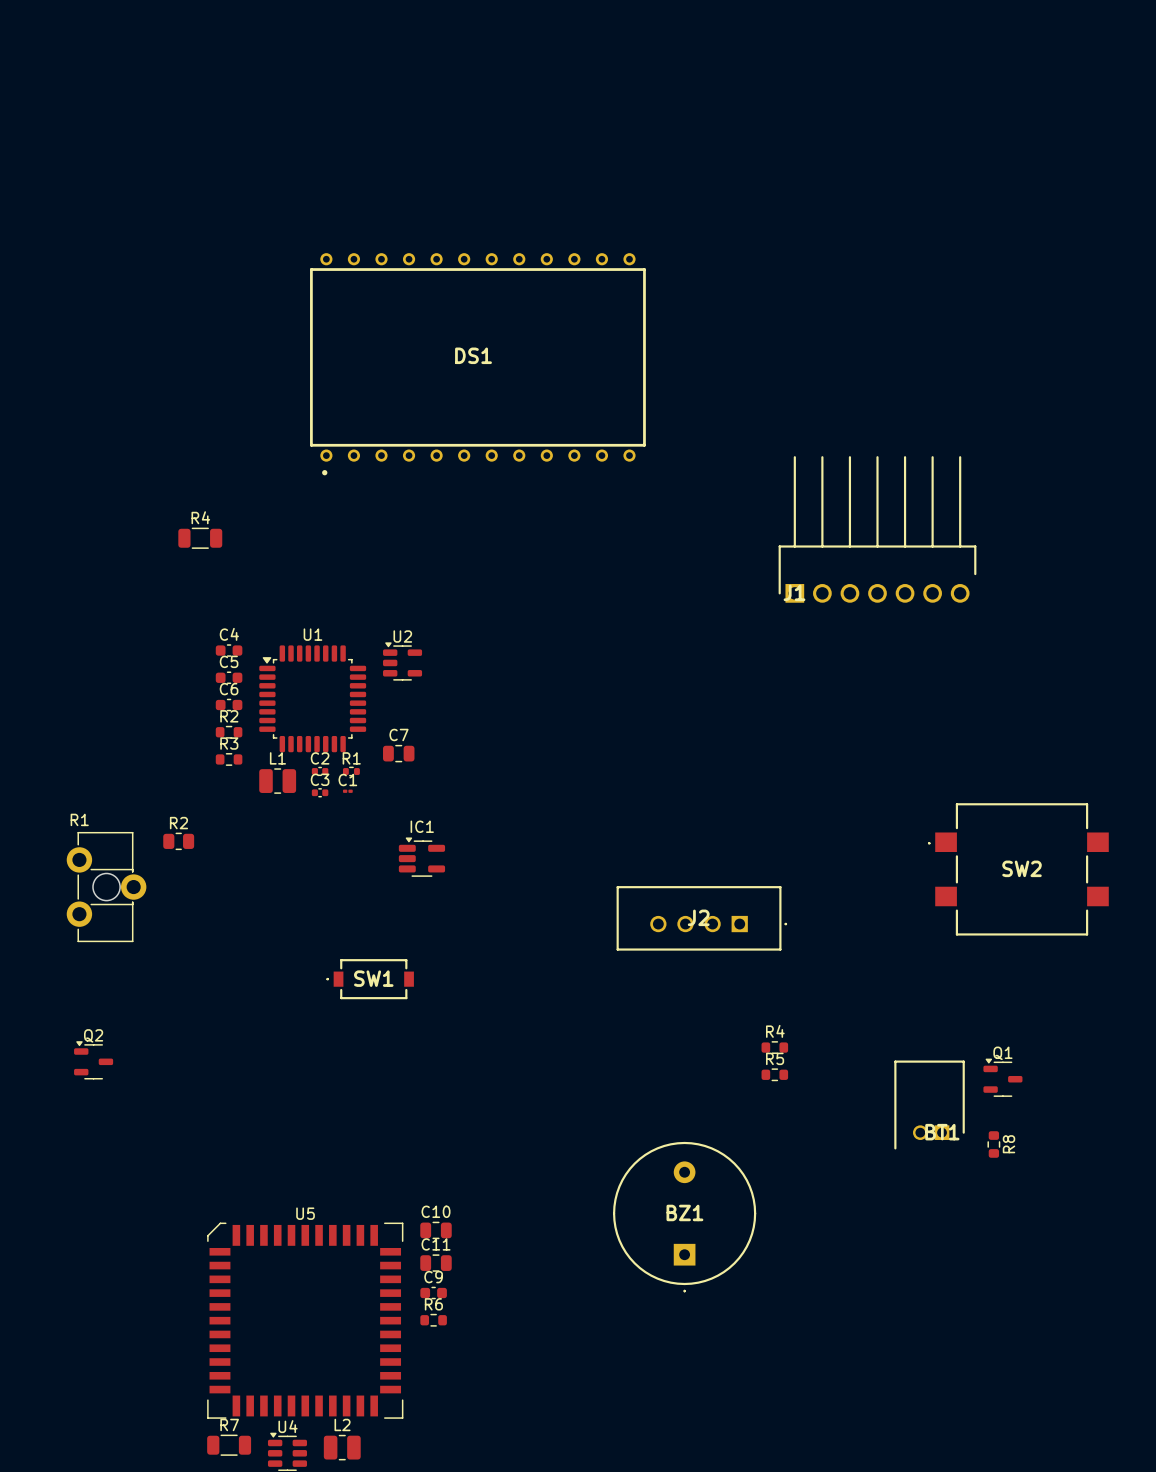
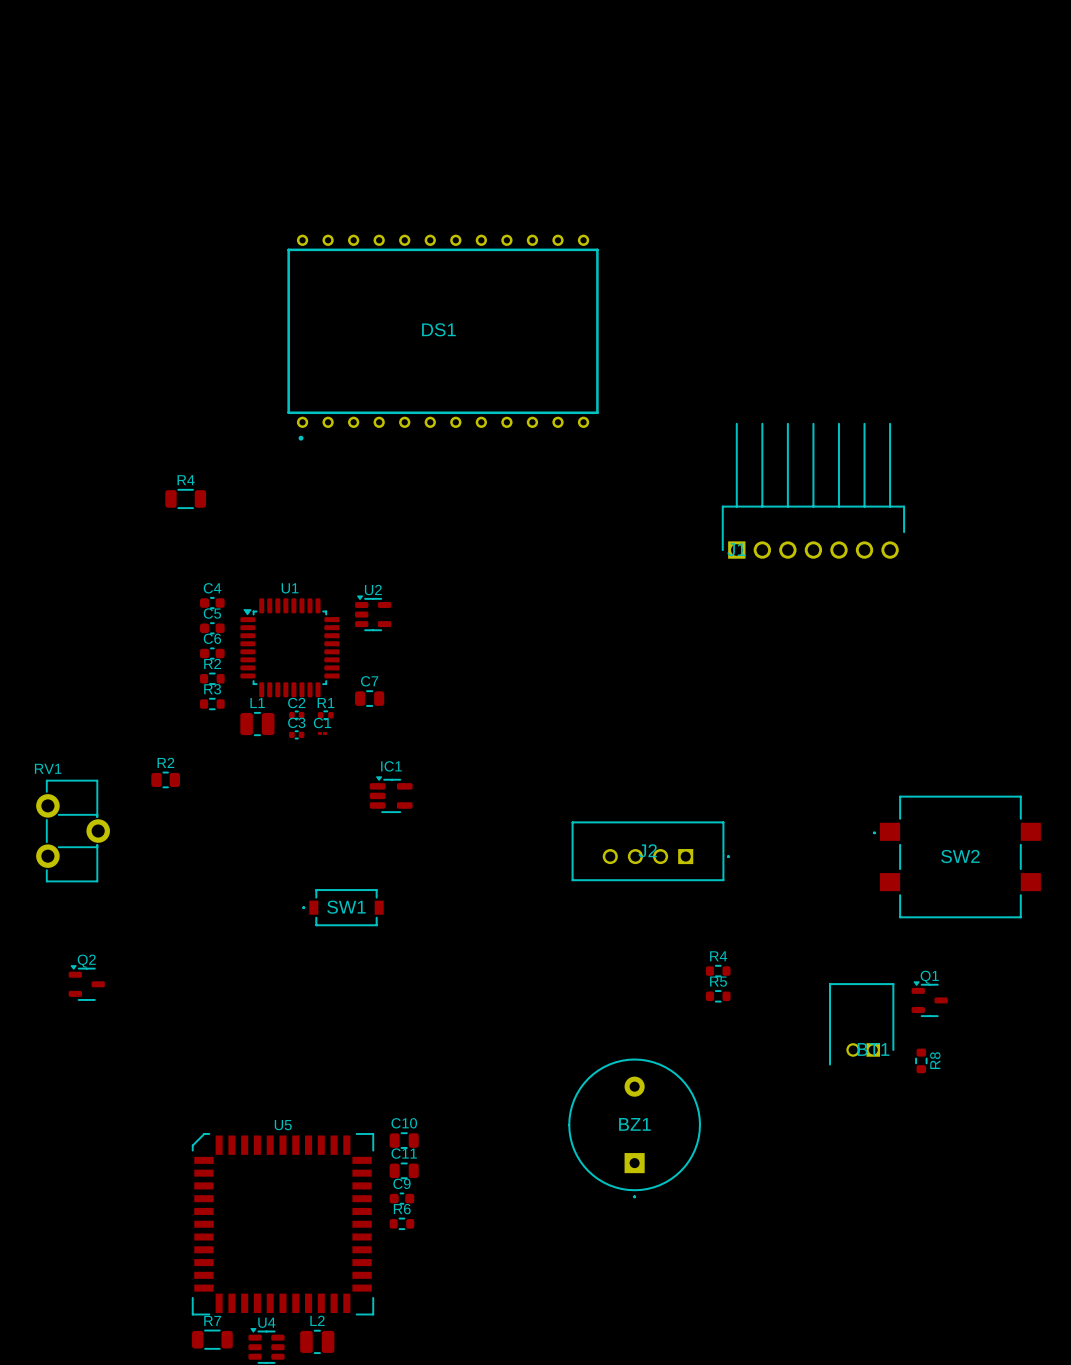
SW2 position: (1018, 869) -> (957, 856)
R1: (106, 887) -> none
RV1: none -> (73, 831)

